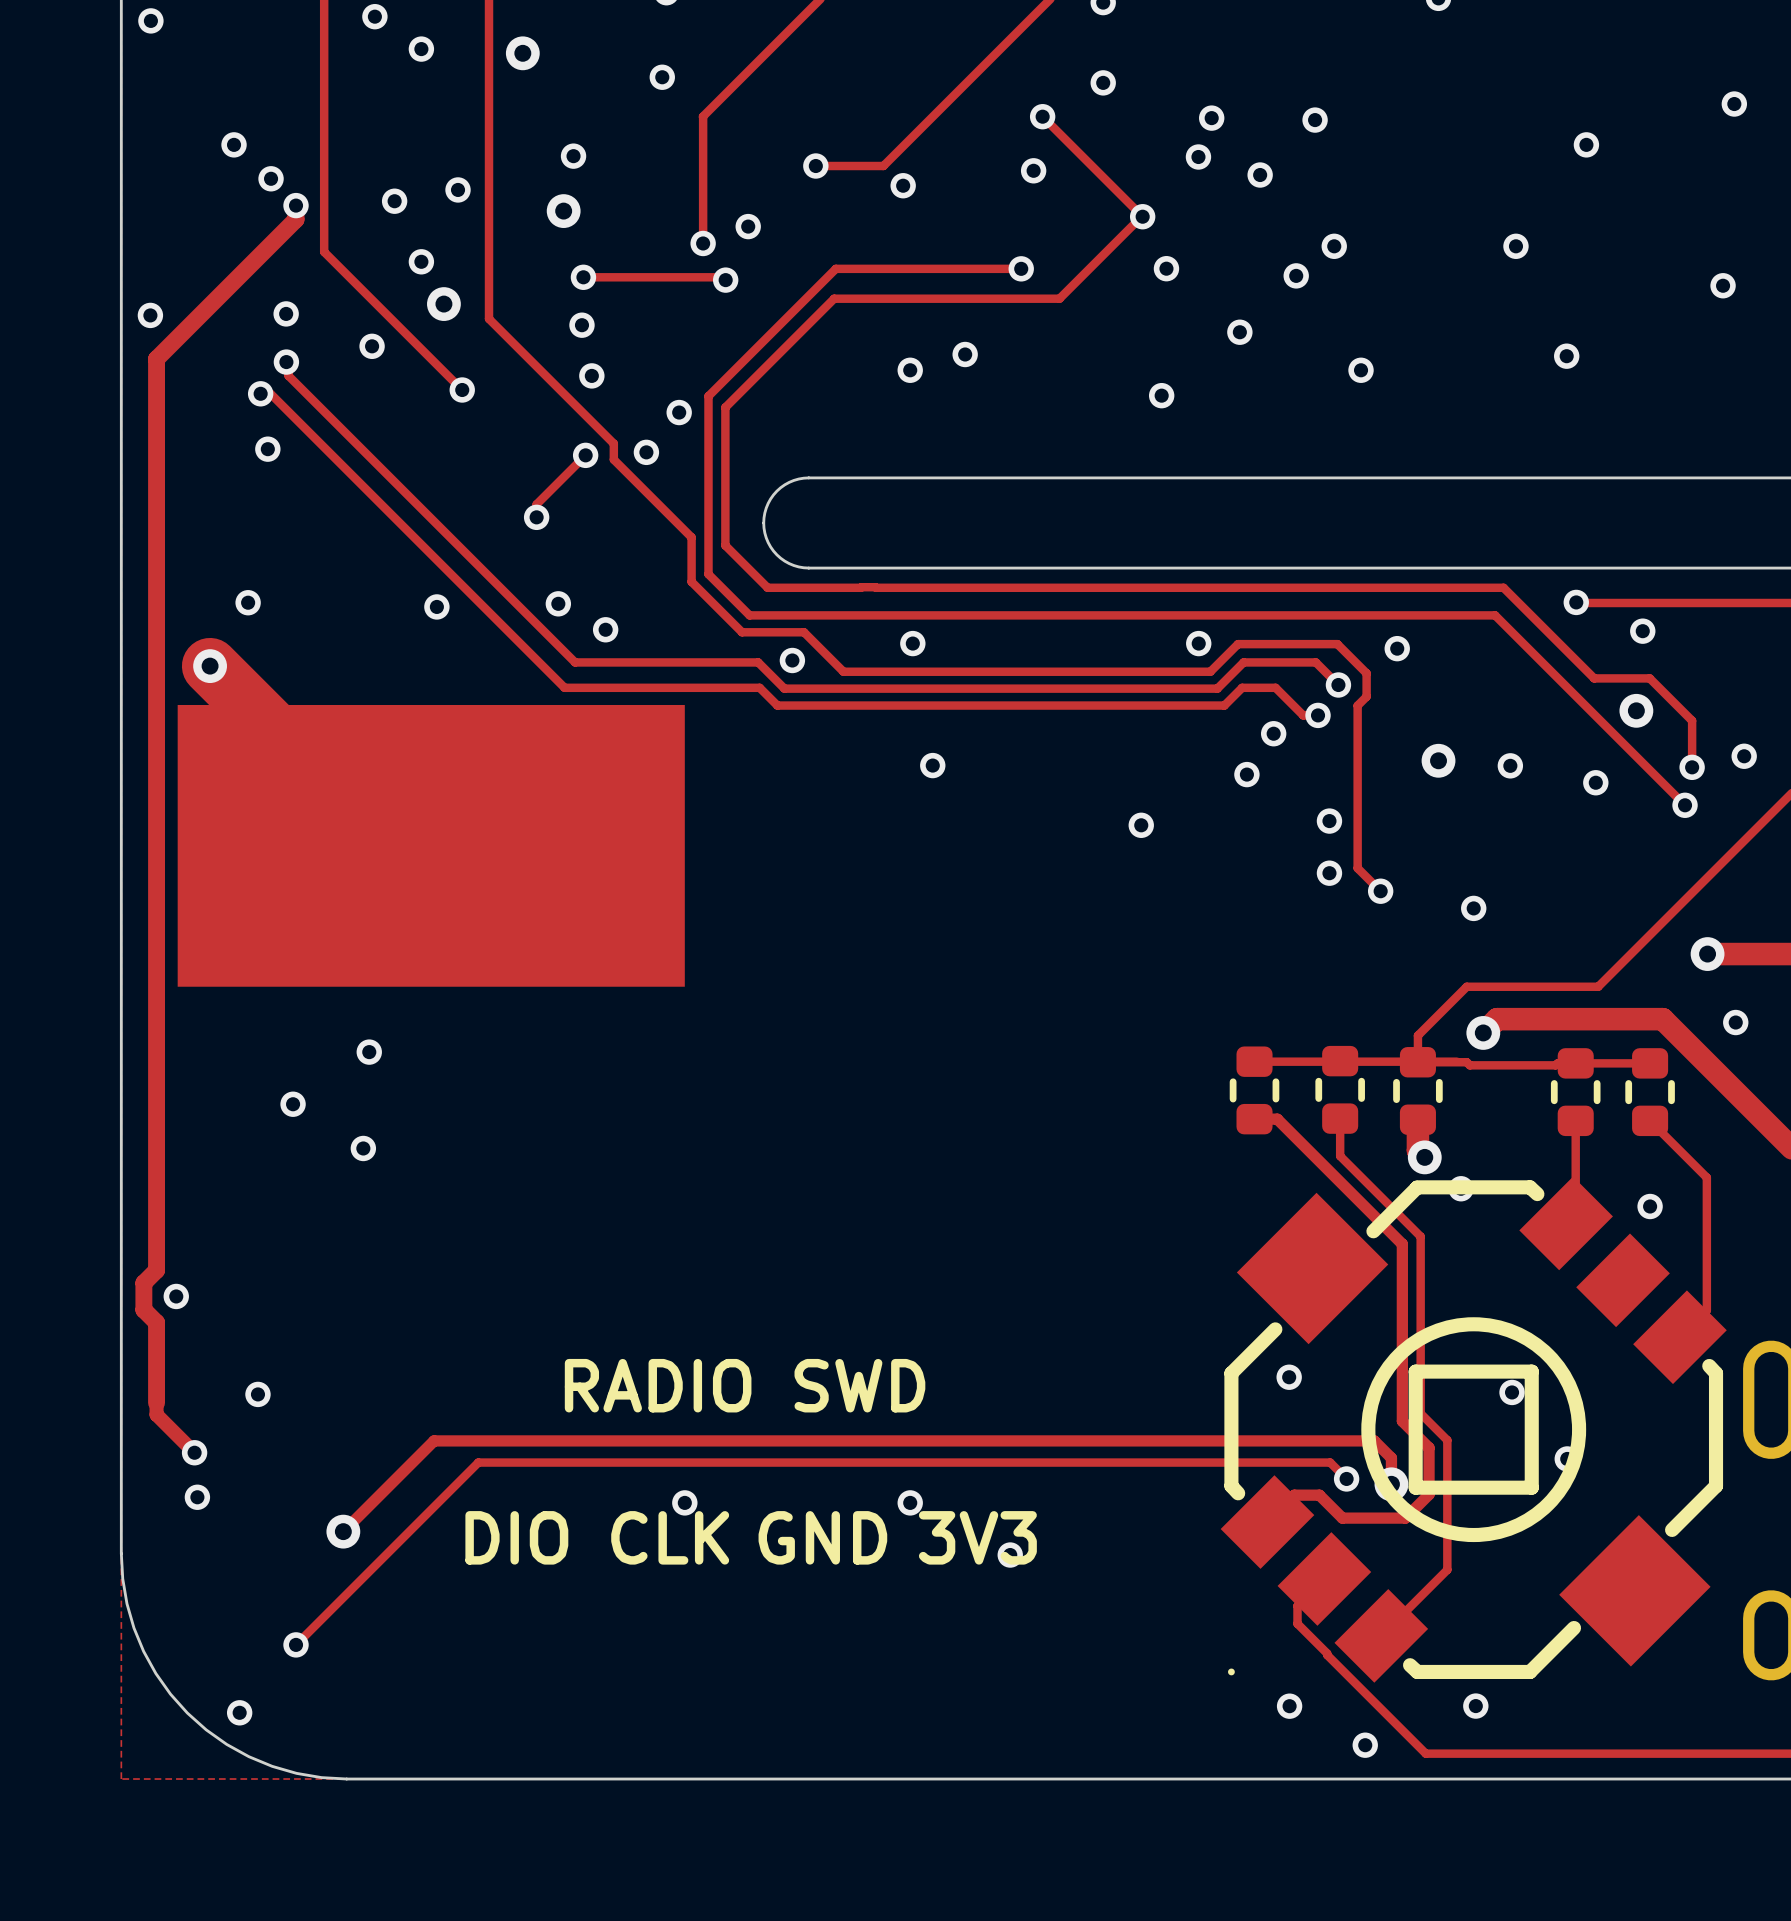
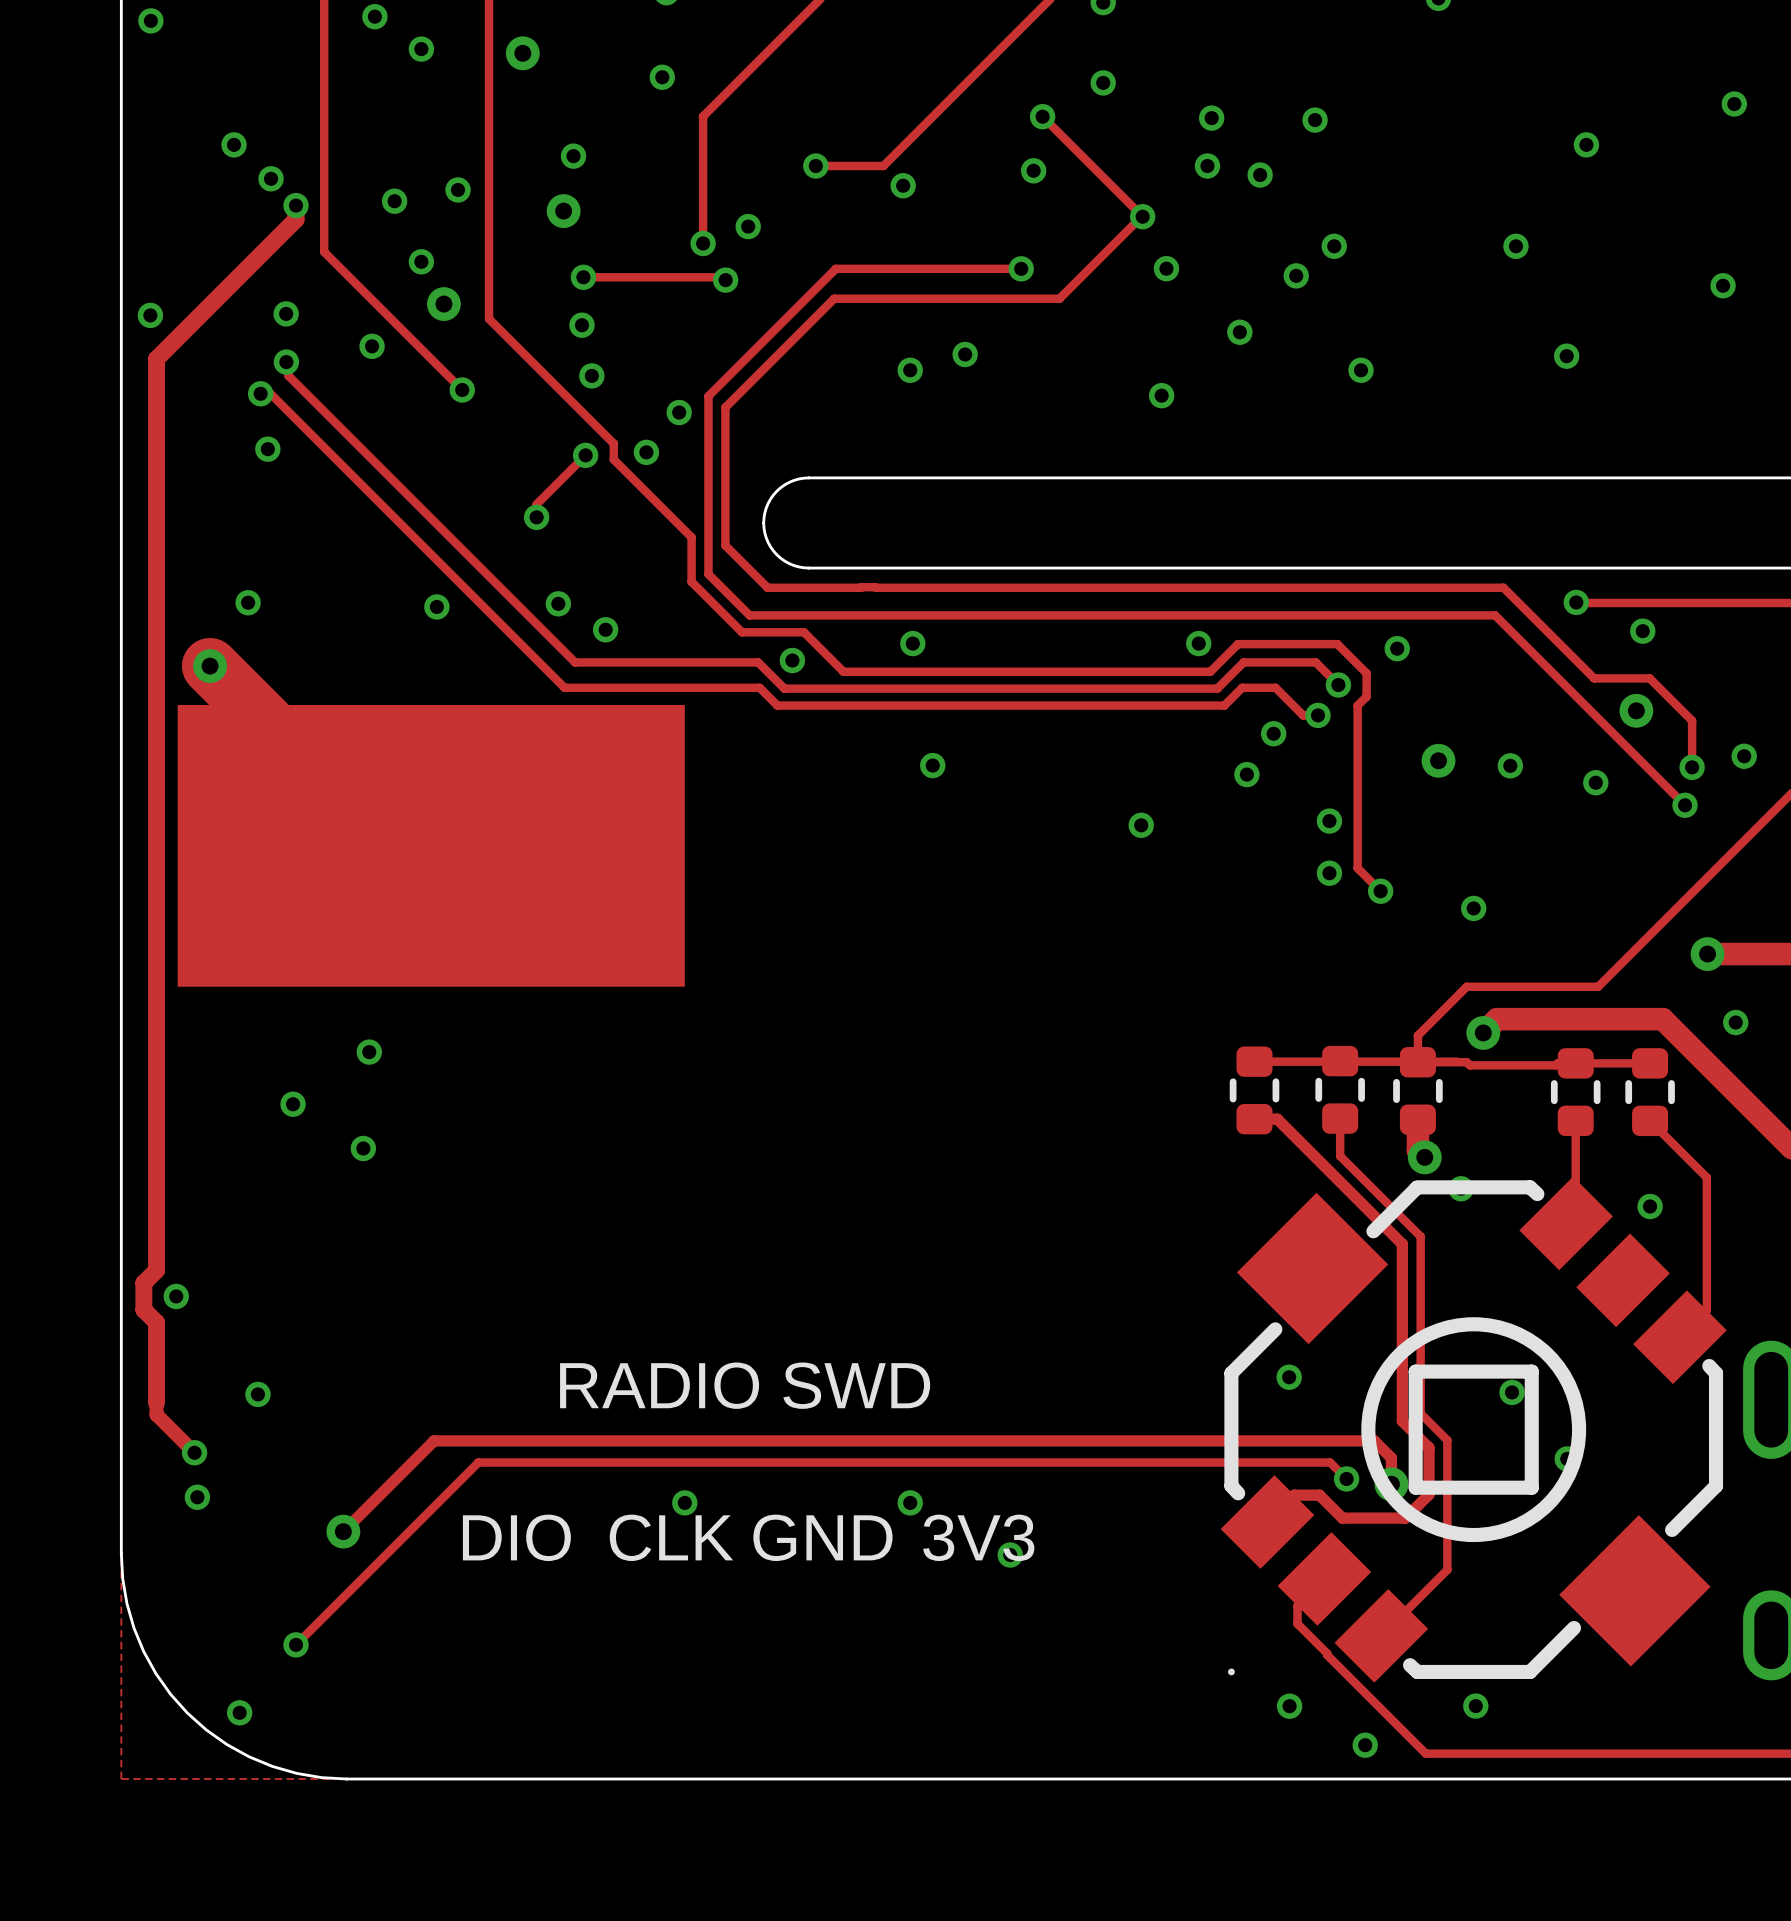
via position: (1198, 157) -> (1207, 166)

